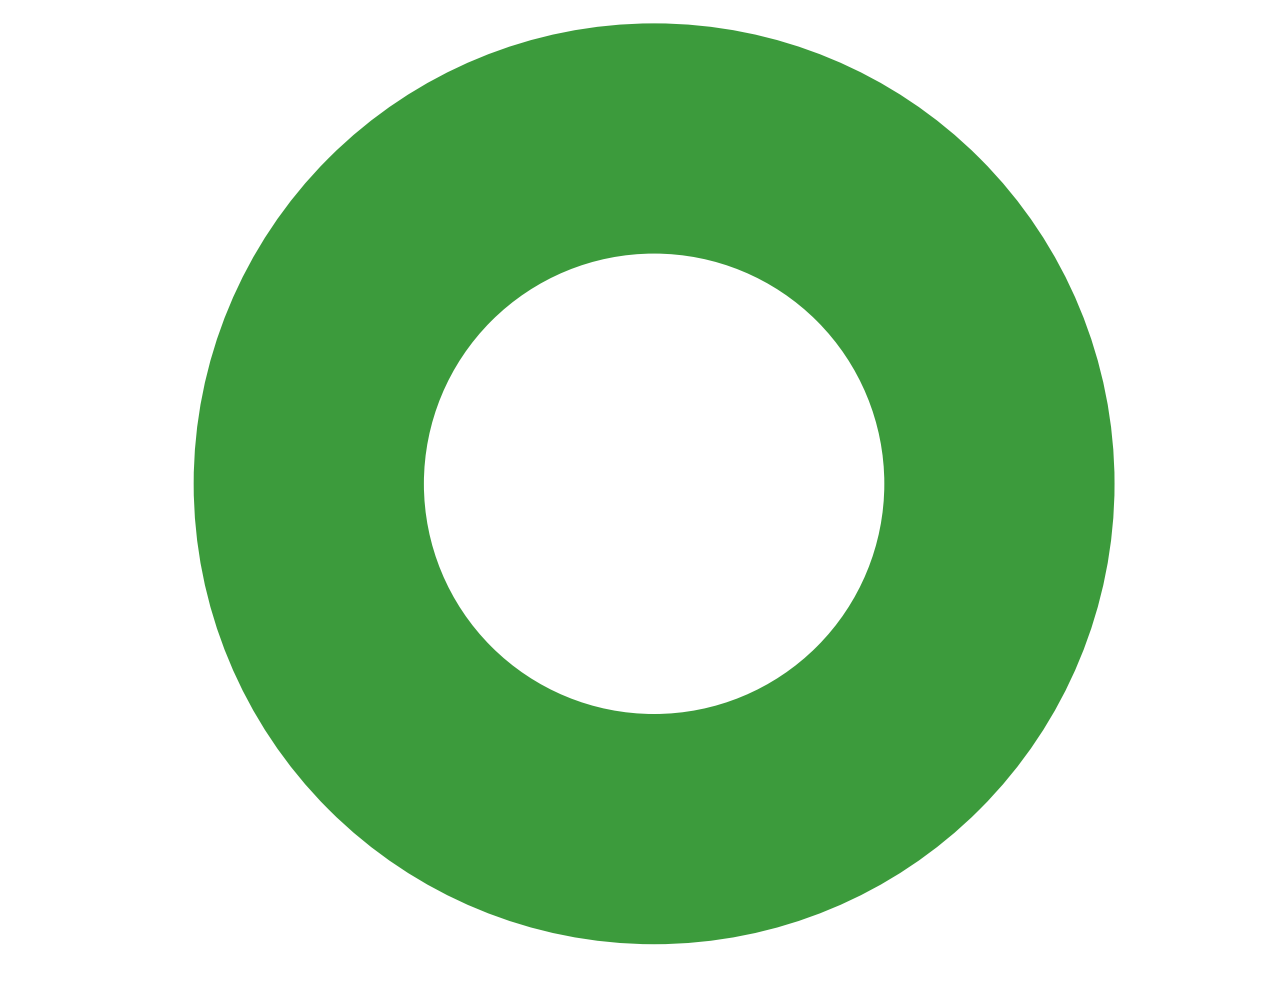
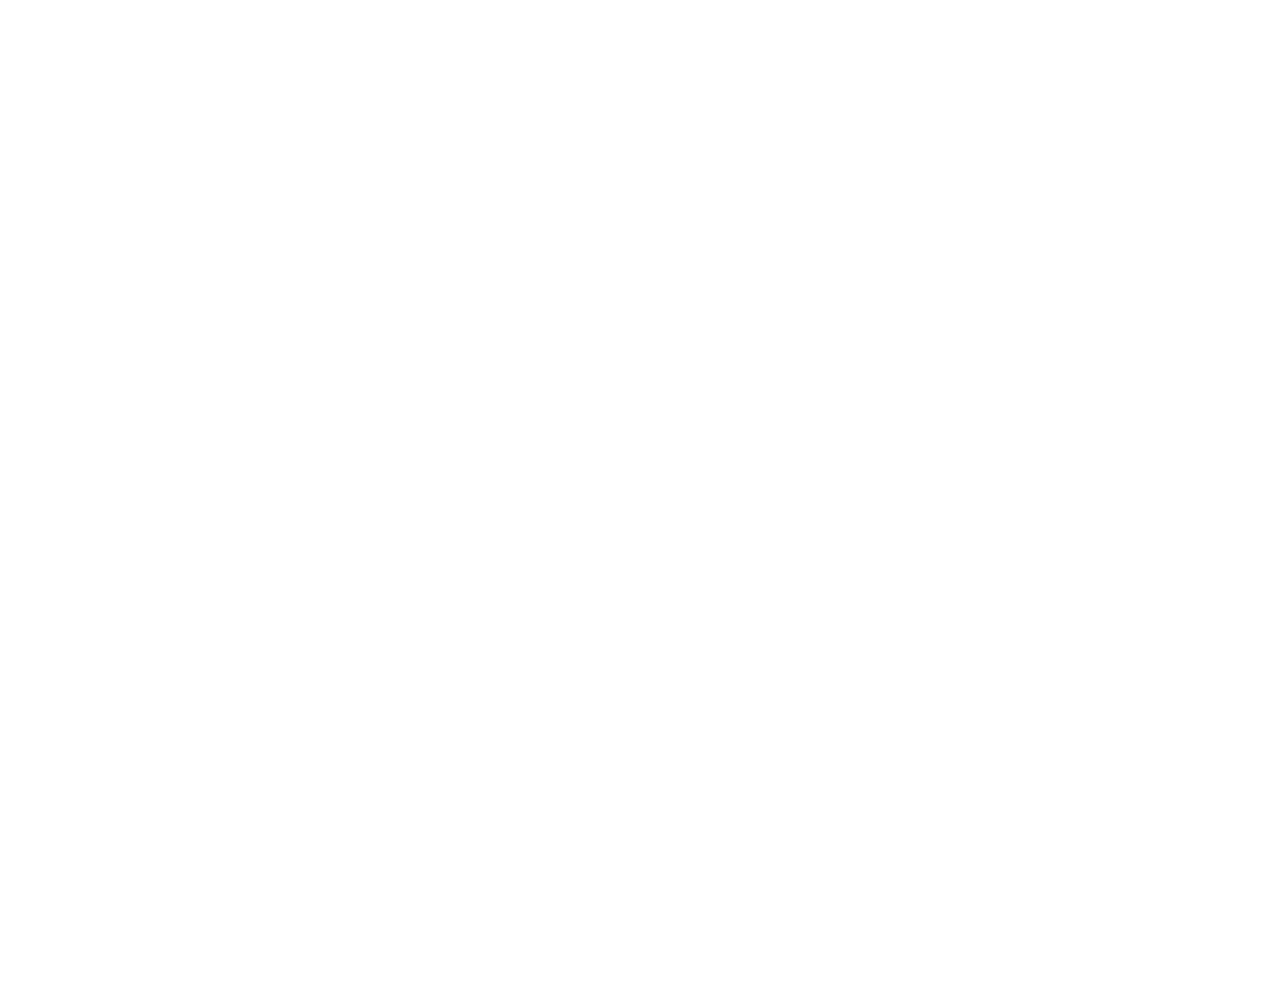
part: (654, 483) -> none

